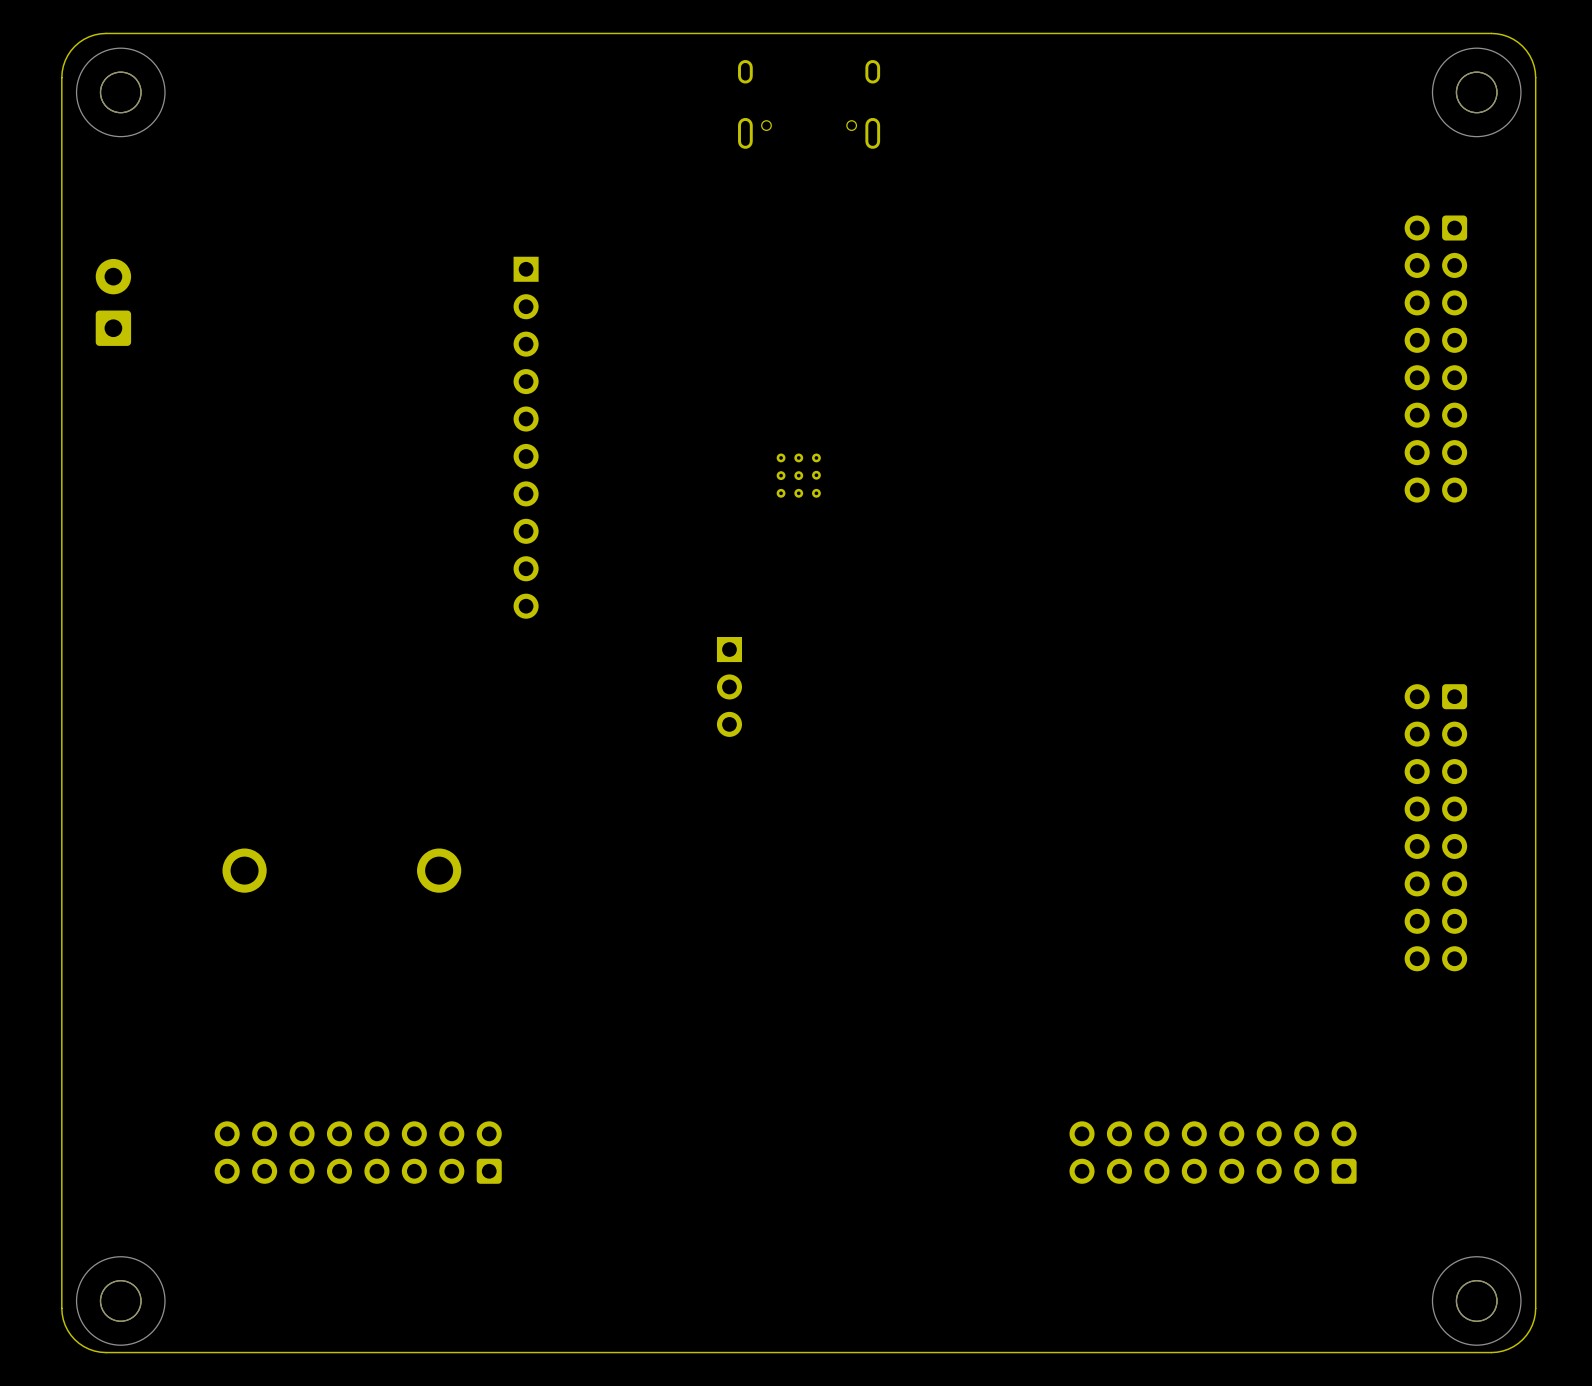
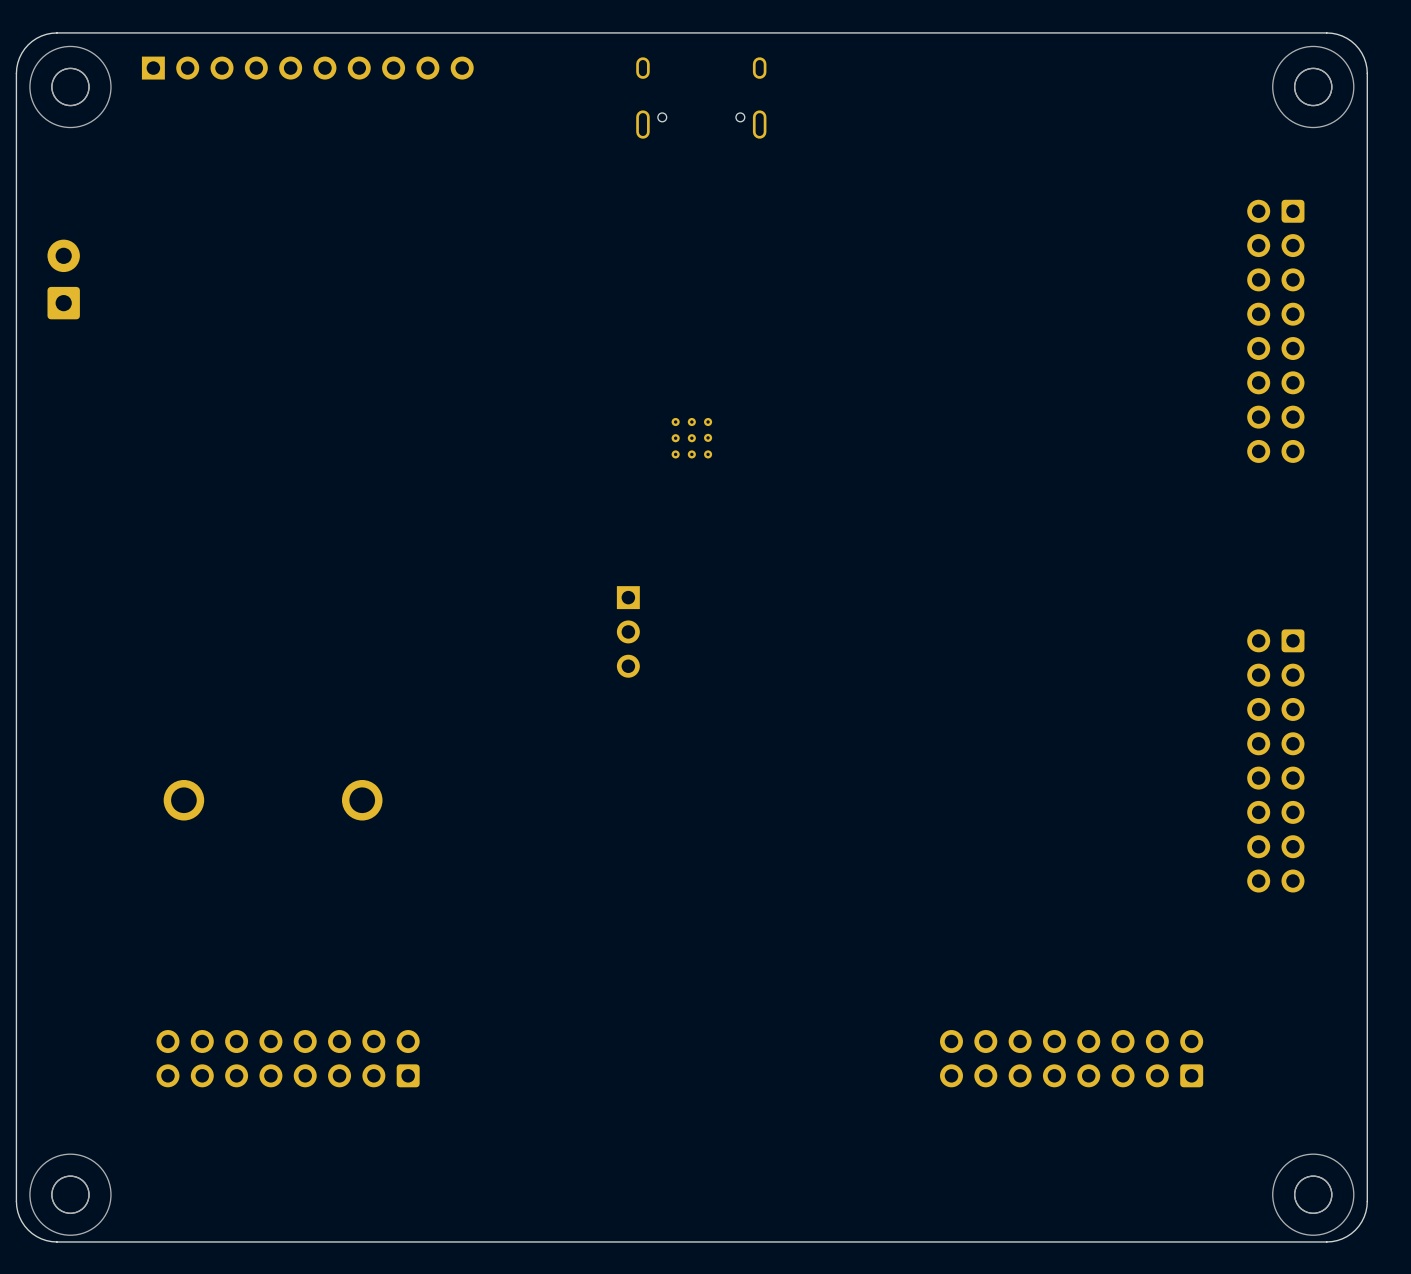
part: none -> (307, 68)
part: (526, 437) -> none

